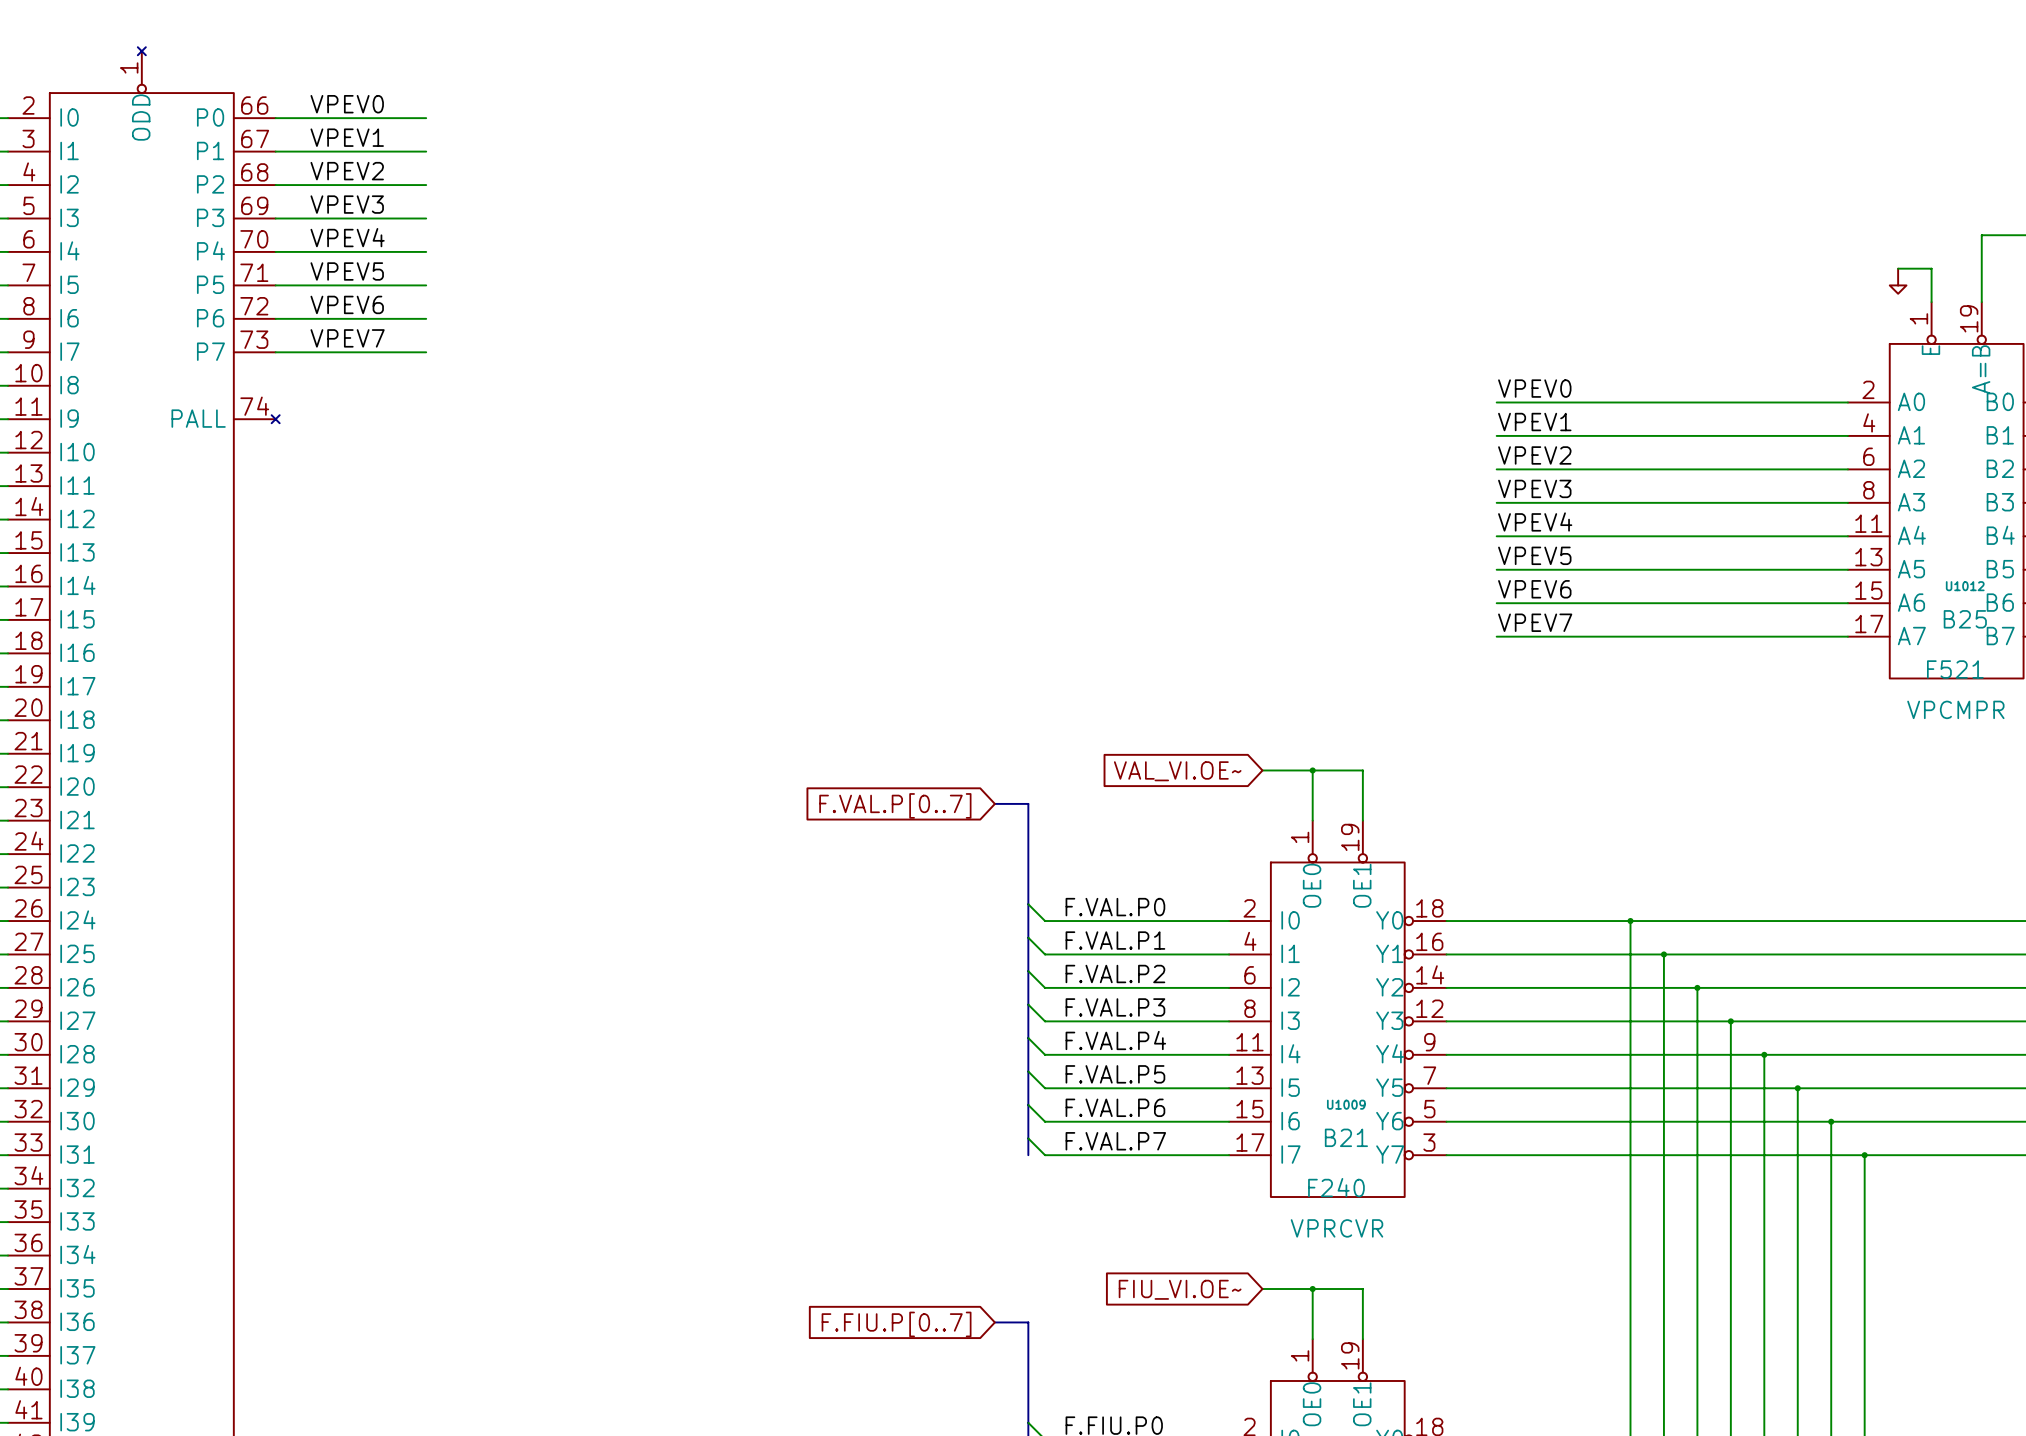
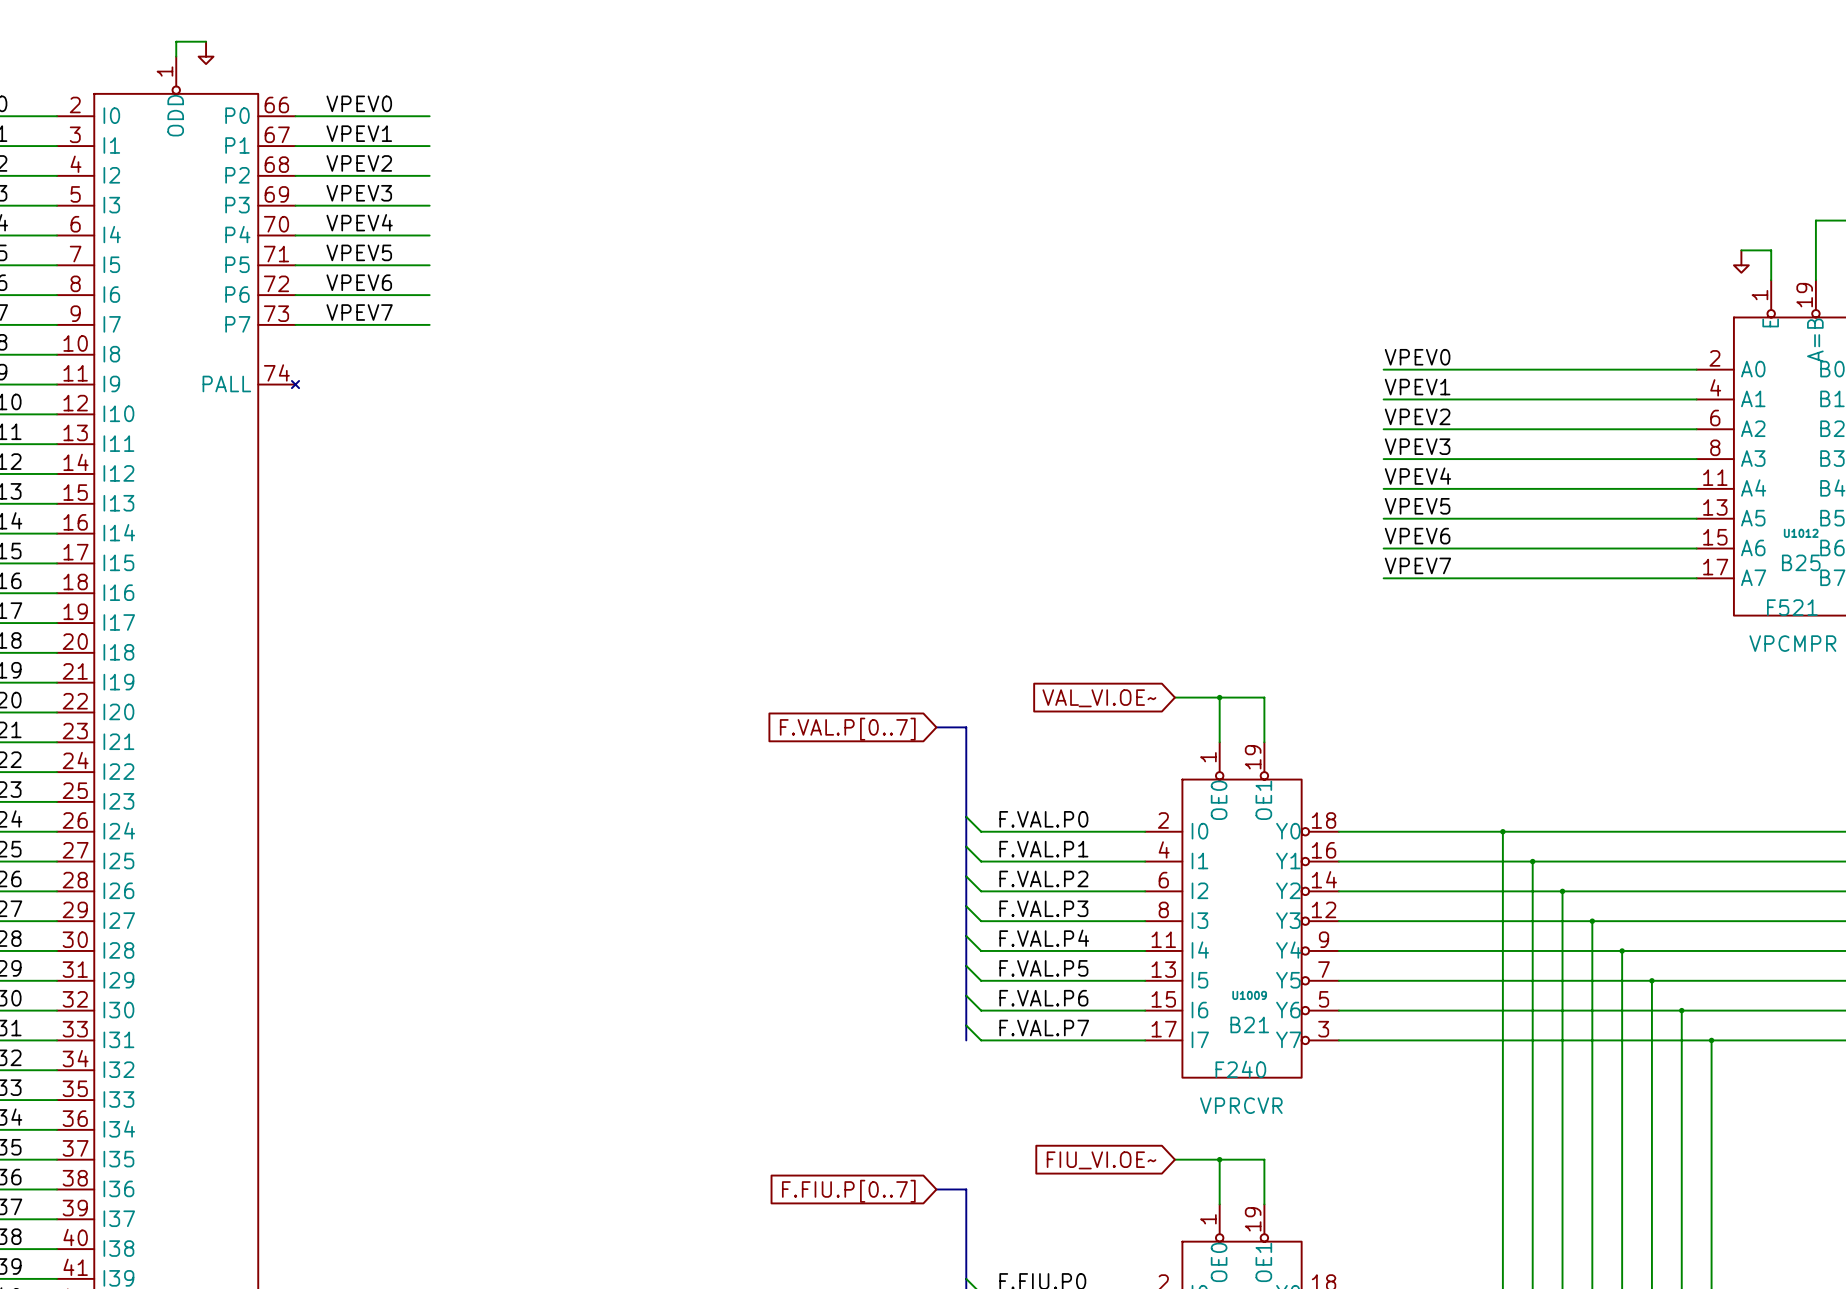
wire: none -> (206, 41) (176, 41) (176, 56)
power symbol: none -> (206, 53)
no-connect mark: (141, 51) -> none

